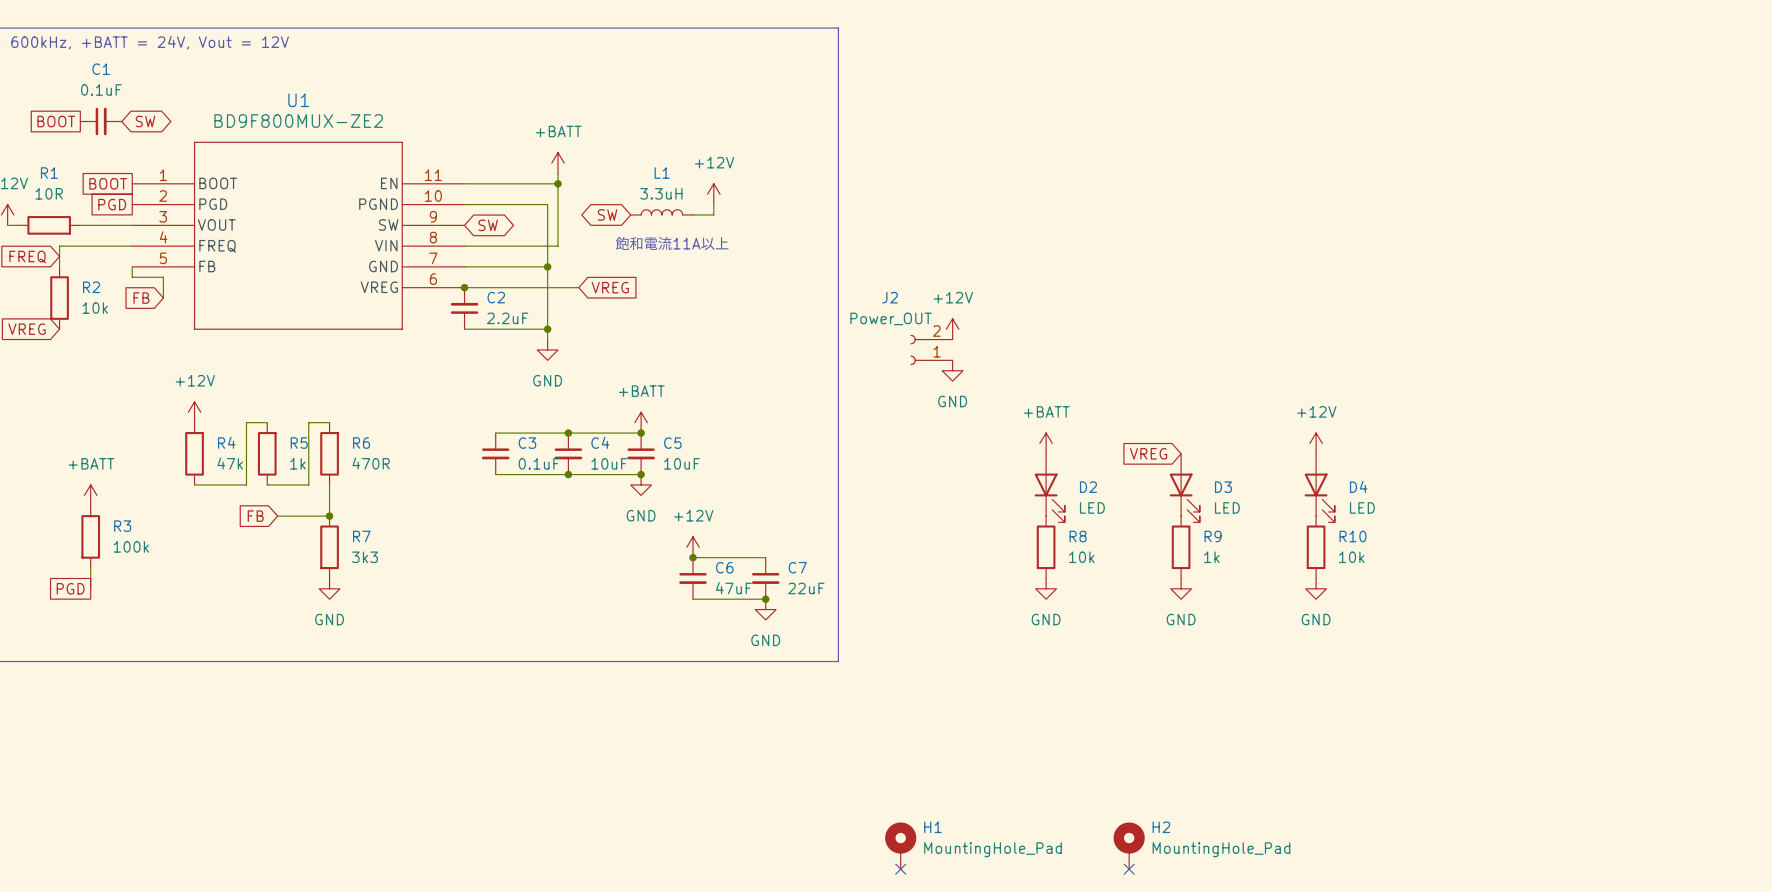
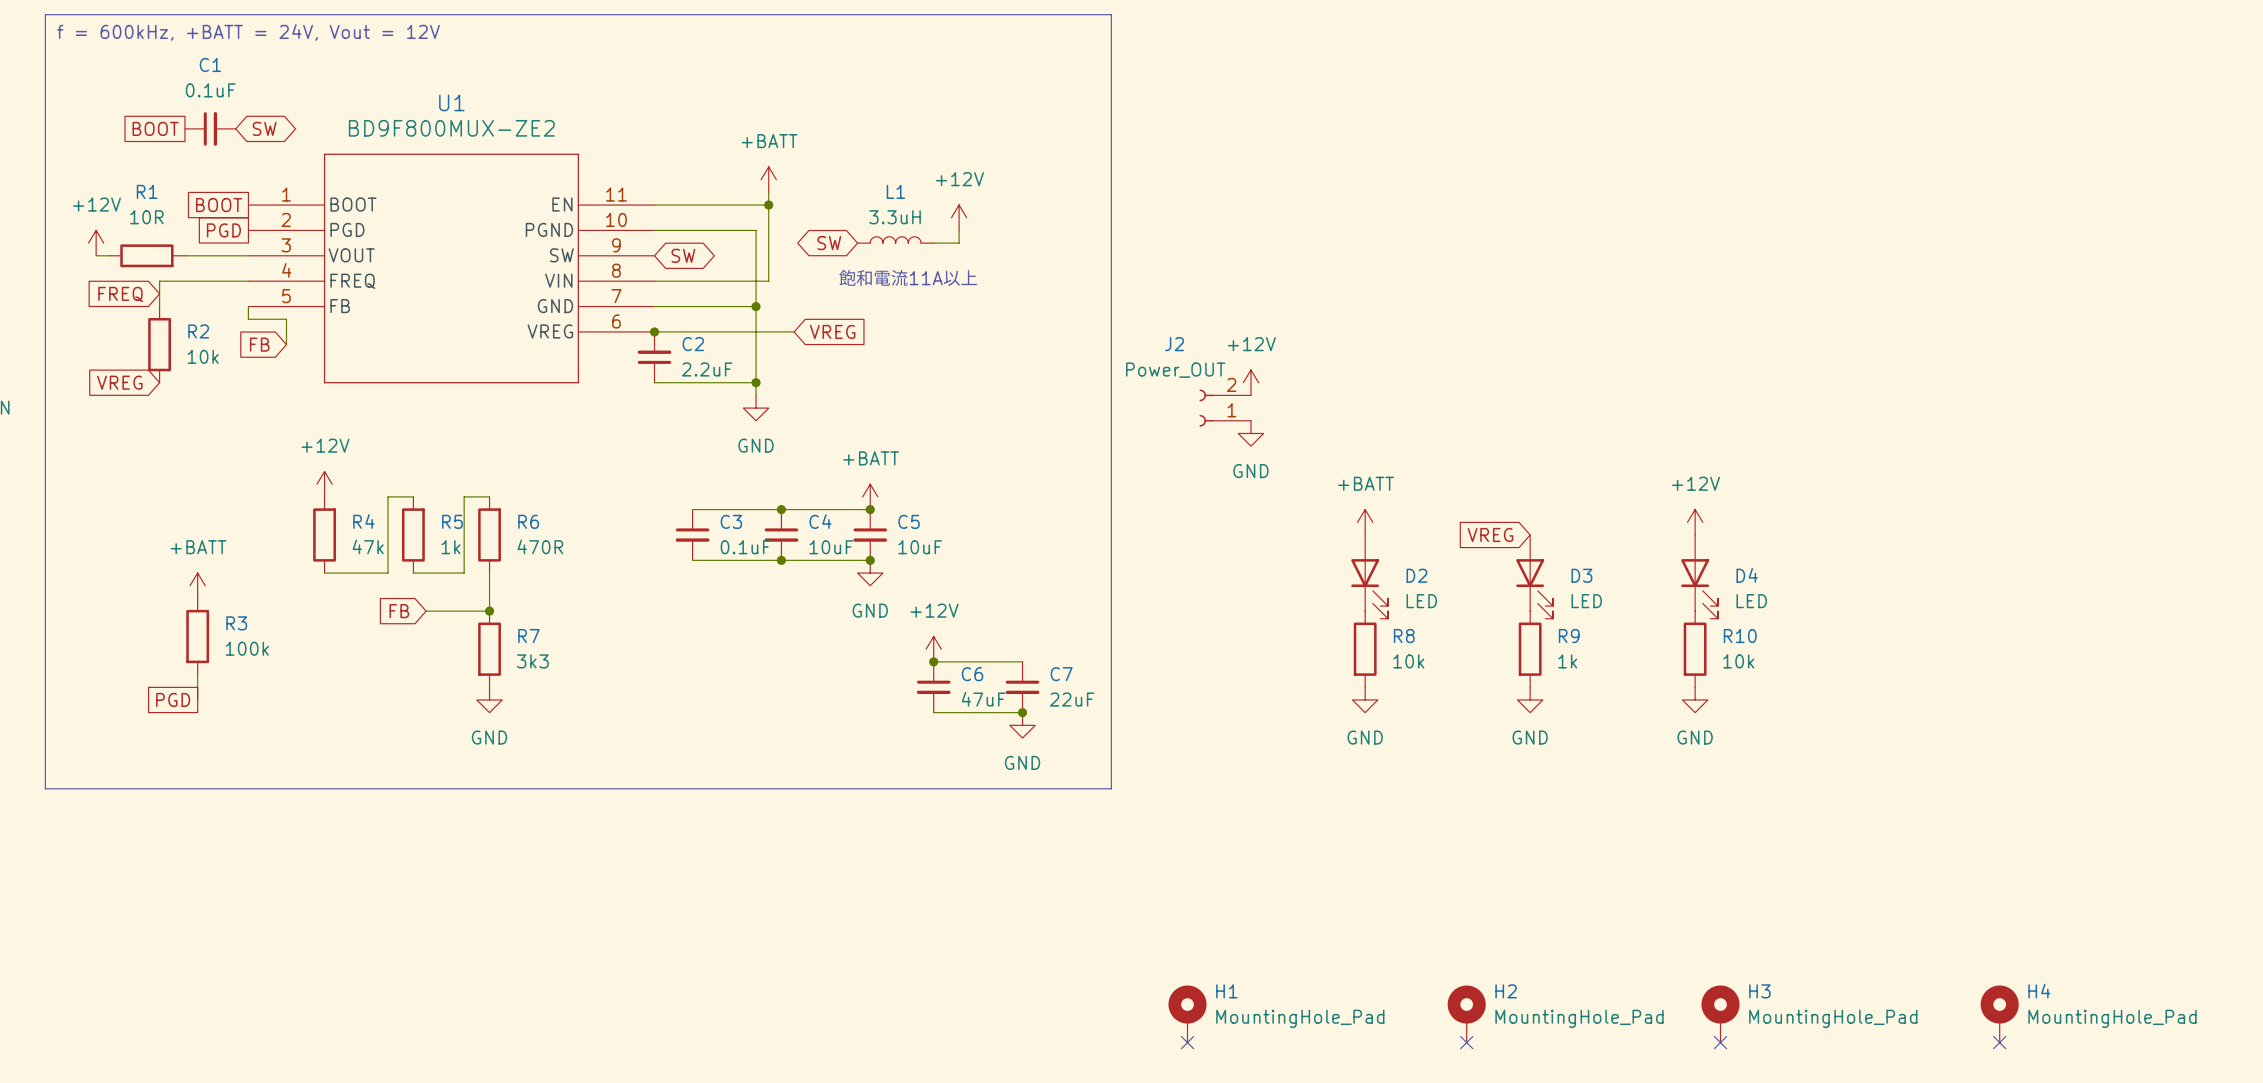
H3: none -> MountingHole_Pad (1720, 1014)
H4: none -> MountingHole_Pad (1999, 1014)
no-connect mark: none -> (1720, 1042)
no-connect mark: none -> (1999, 1042)

